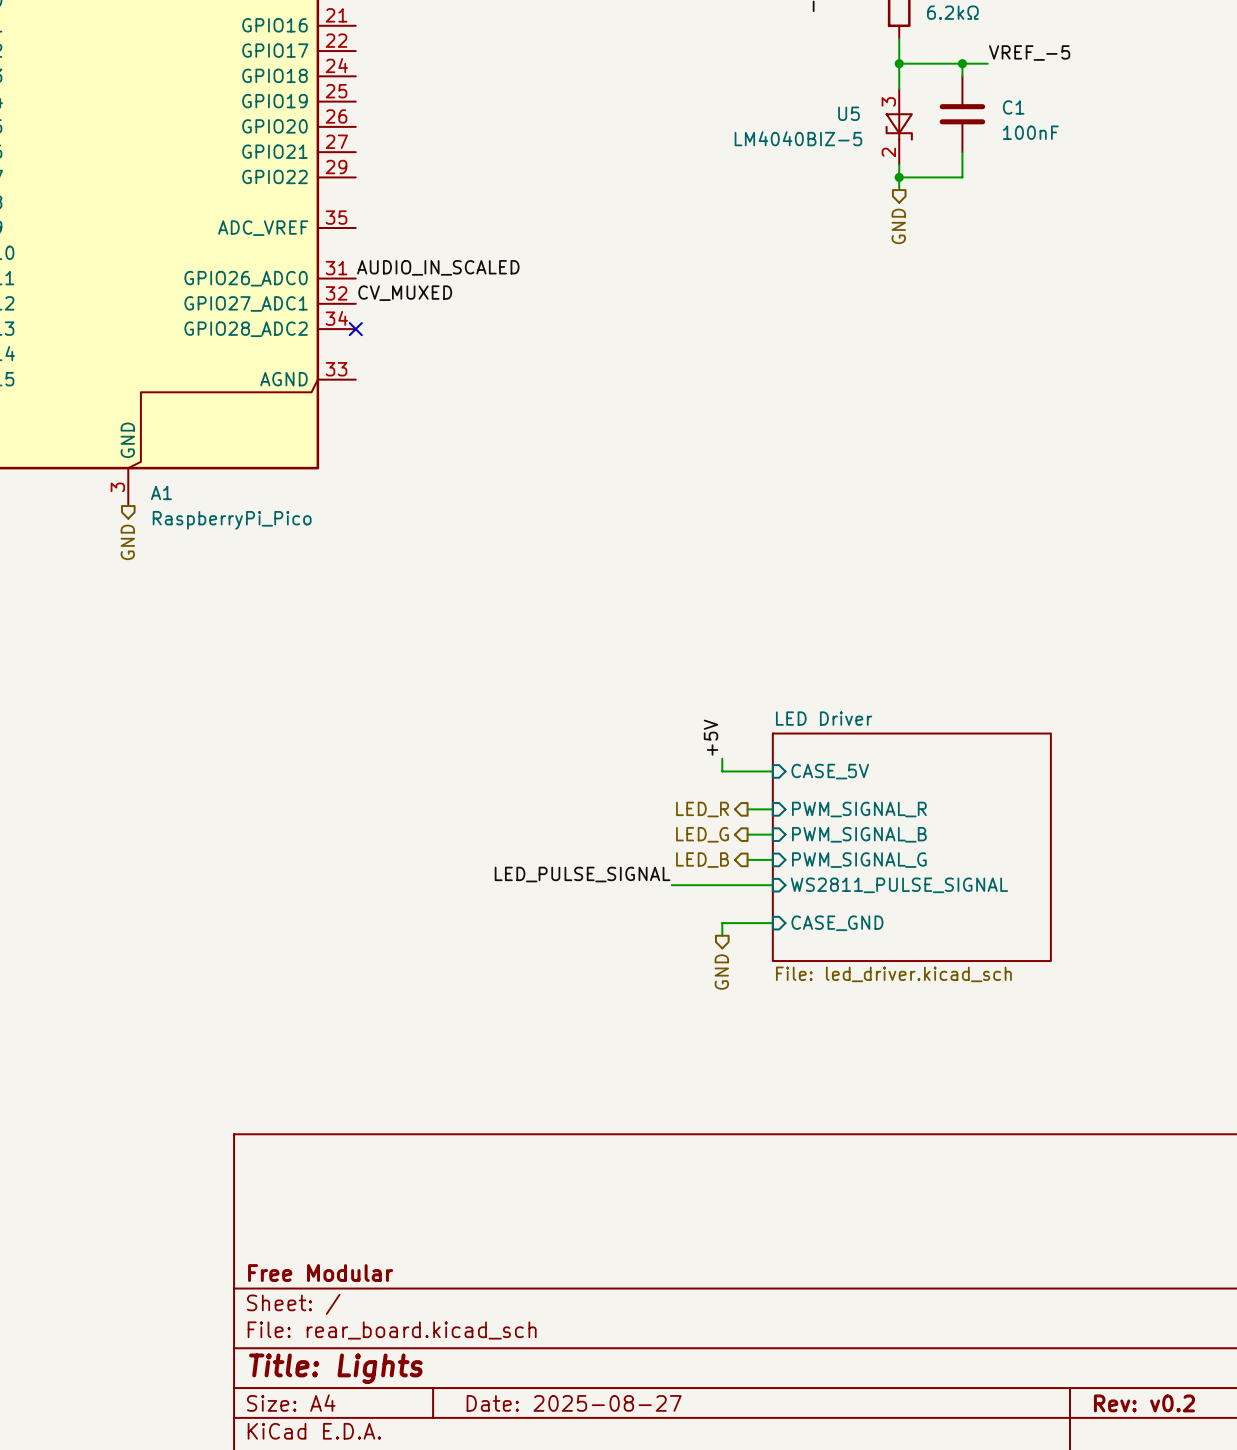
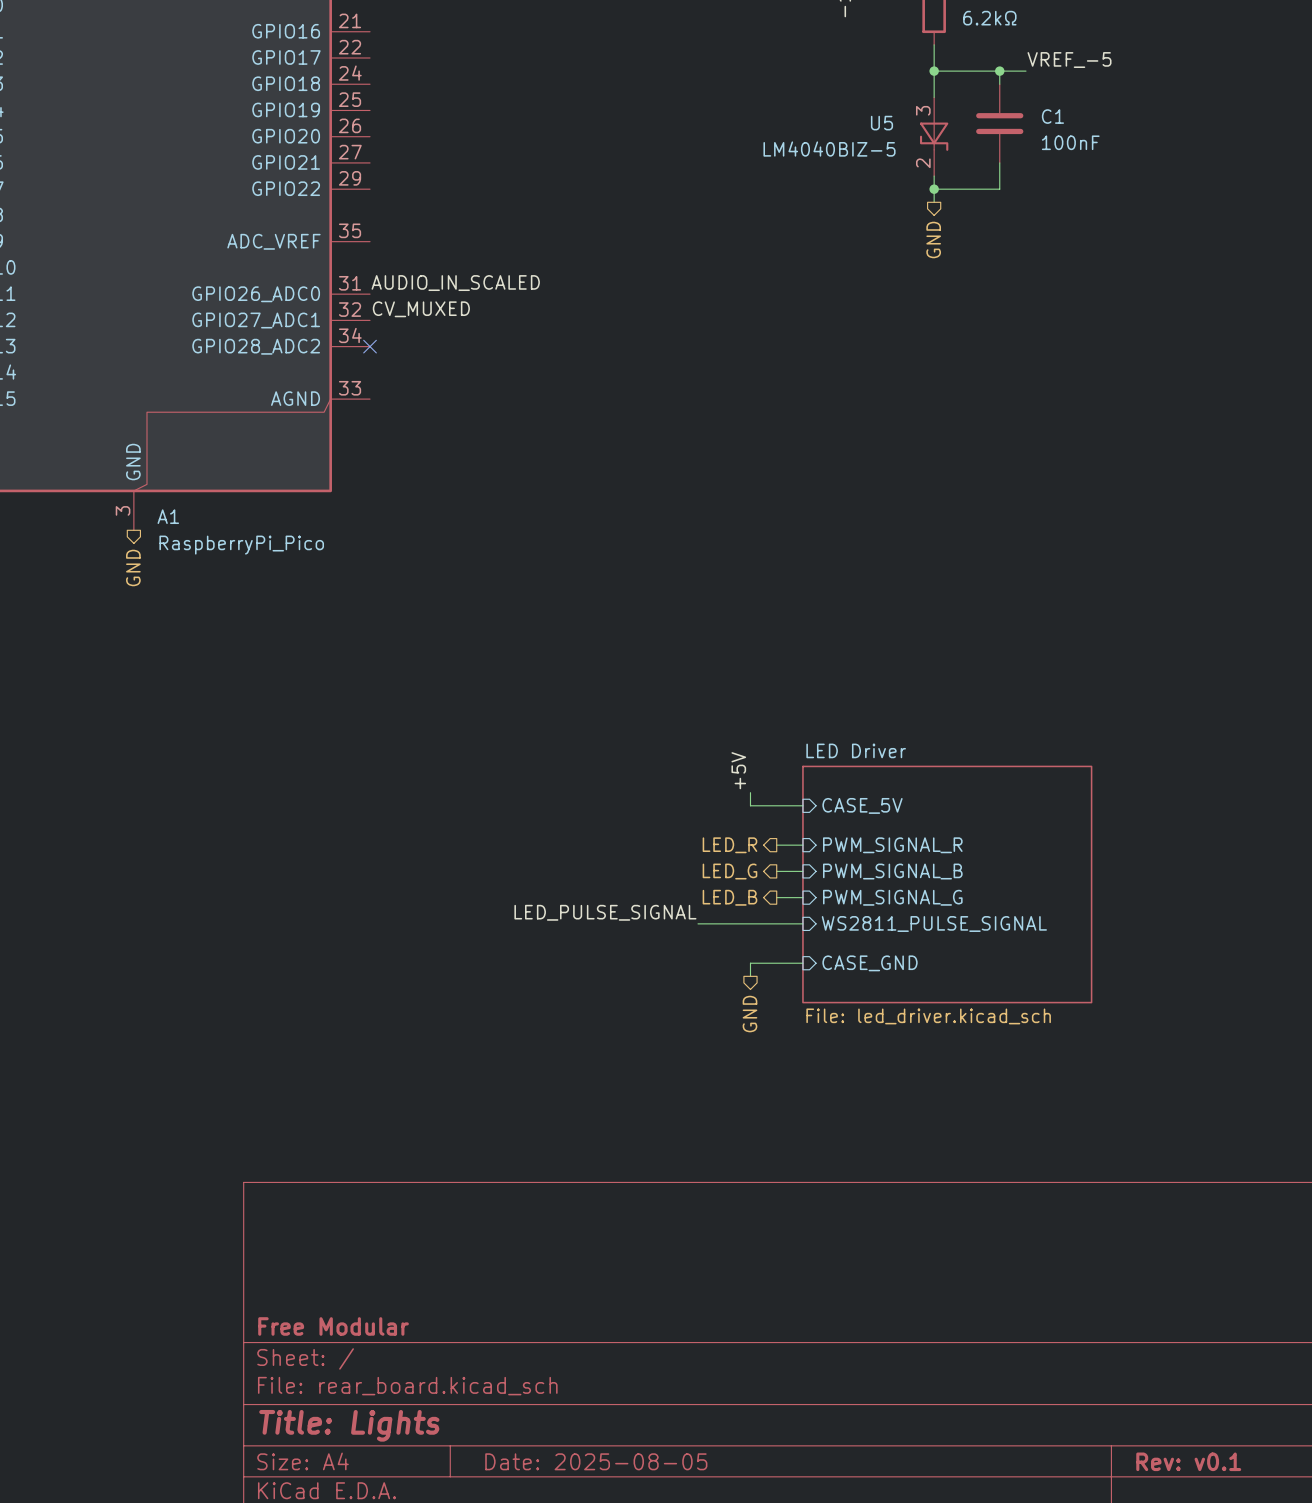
title block: Date: 2025-08-27 (574, 1403) -> Date: 2025-08-05 (596, 1461)
title block: Rev: v0.2 (1144, 1403) -> Rev: v0.1 (1188, 1461)

